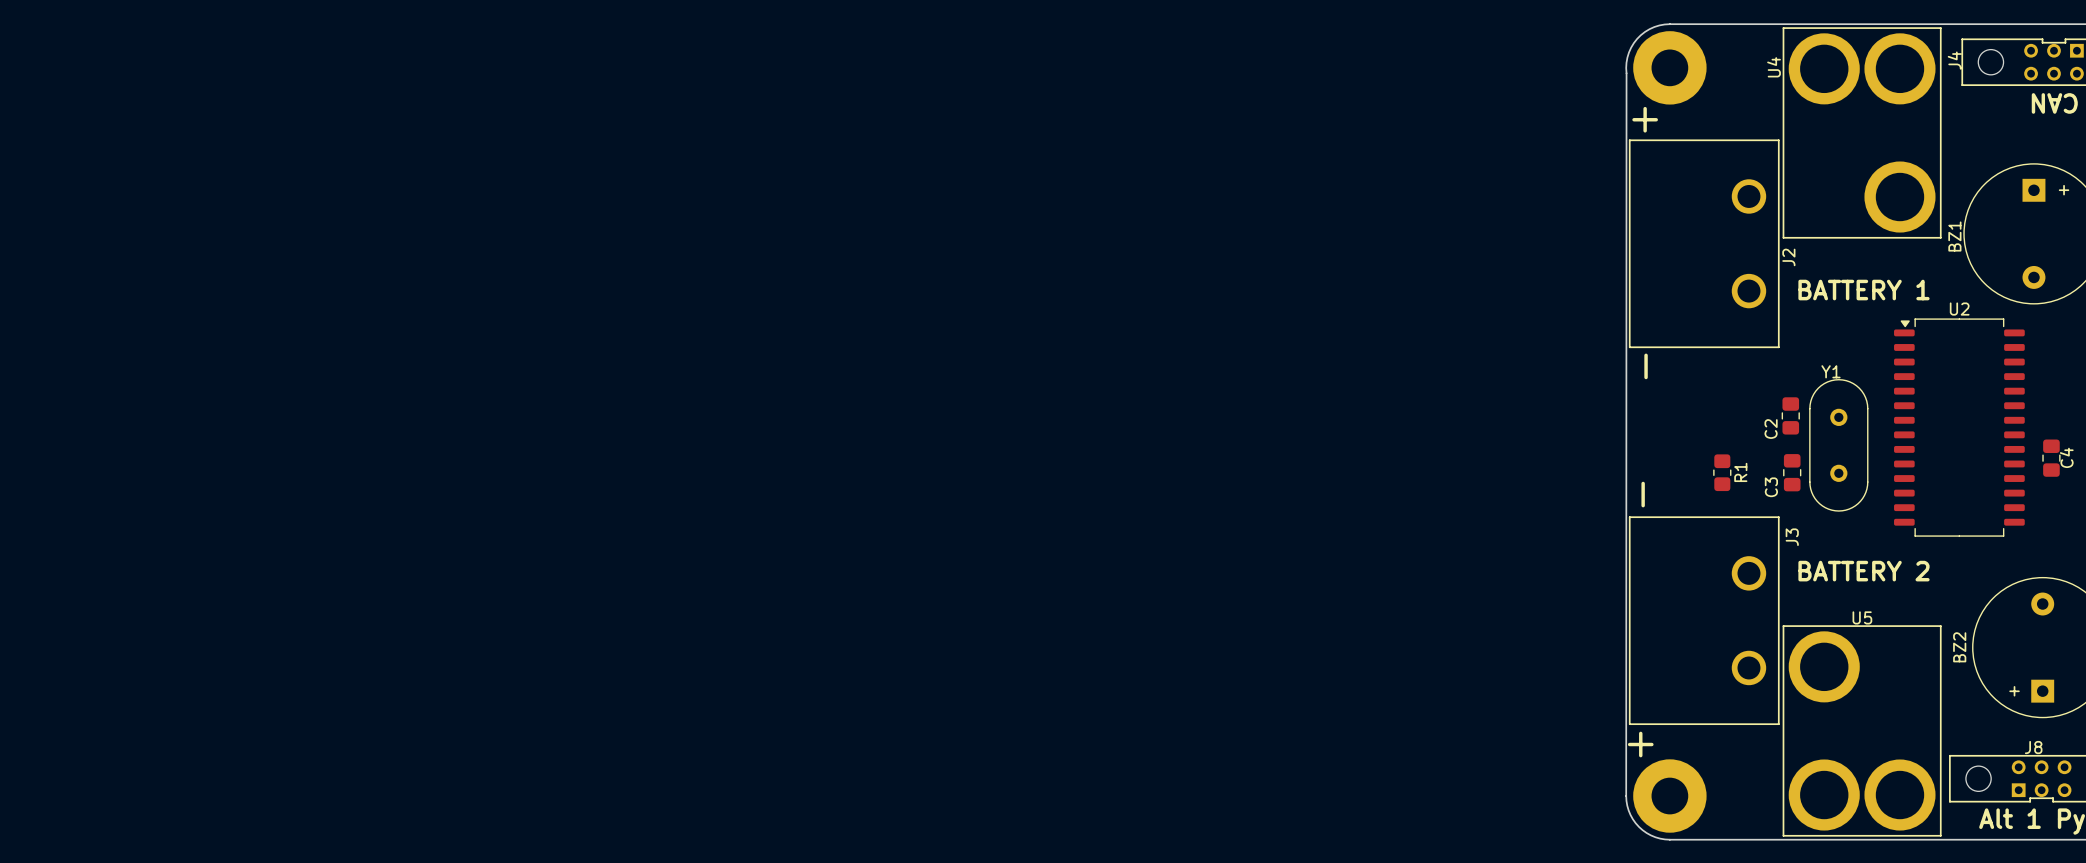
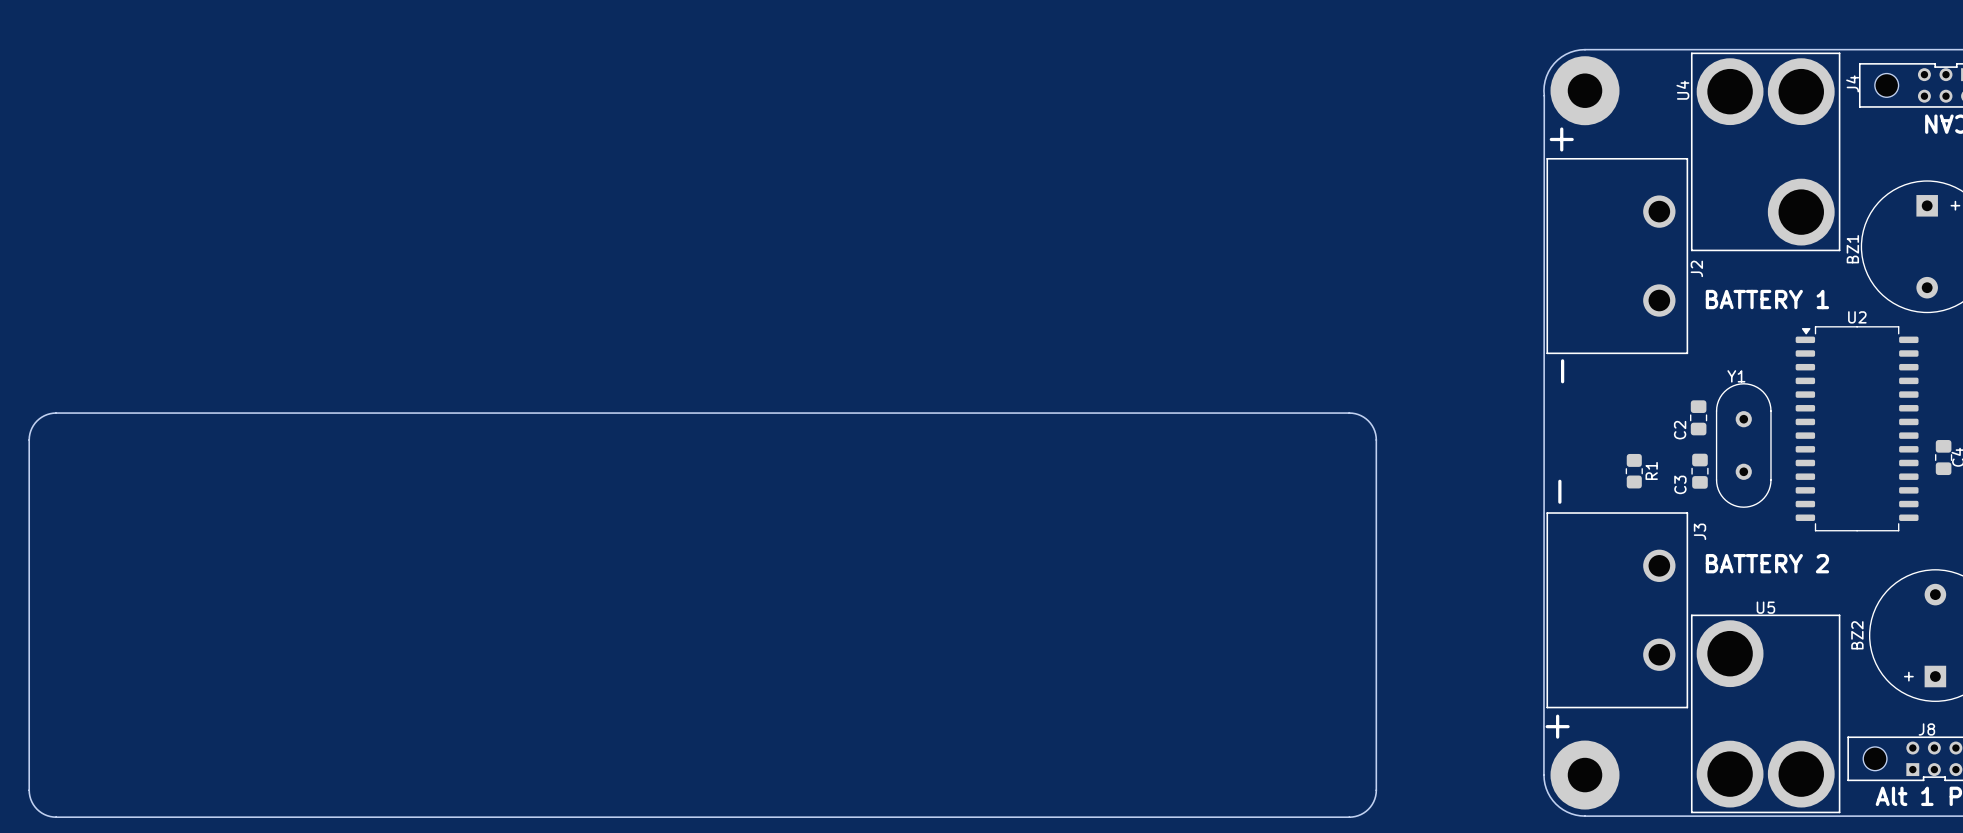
board edge: none -> (56, 413) (1349, 413) (1358, 414) (1370, 423) (1374, 431) (1376, 439) (1374, 799) (1366, 811) (1358, 815) (1349, 817) (56, 817) (47, 815) (35, 807) (30, 799) (29, 790) (29, 439) (30, 431) (37, 420) (47, 414) (56, 413)

